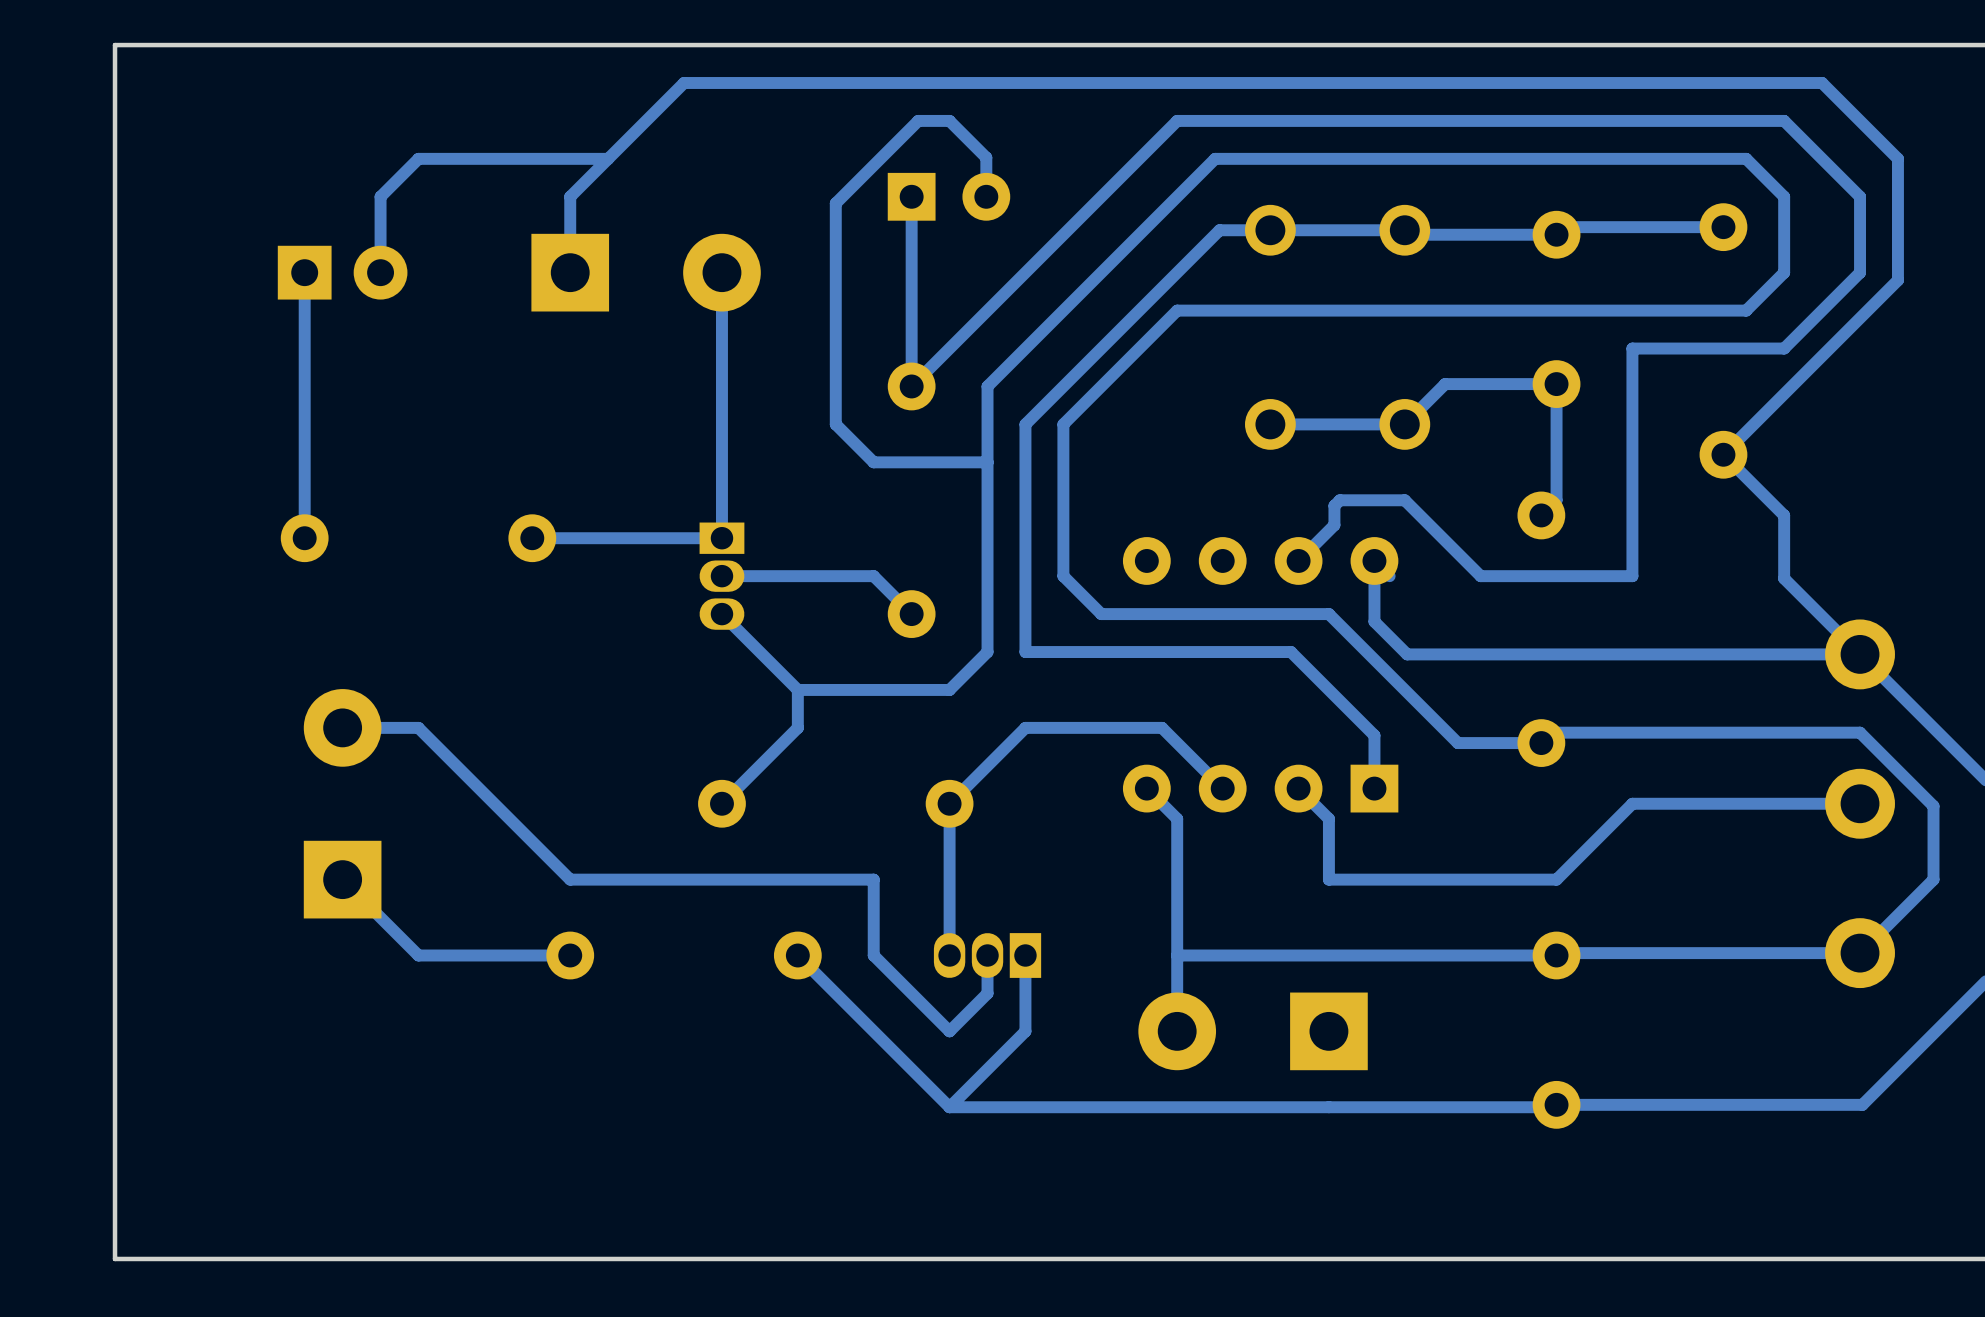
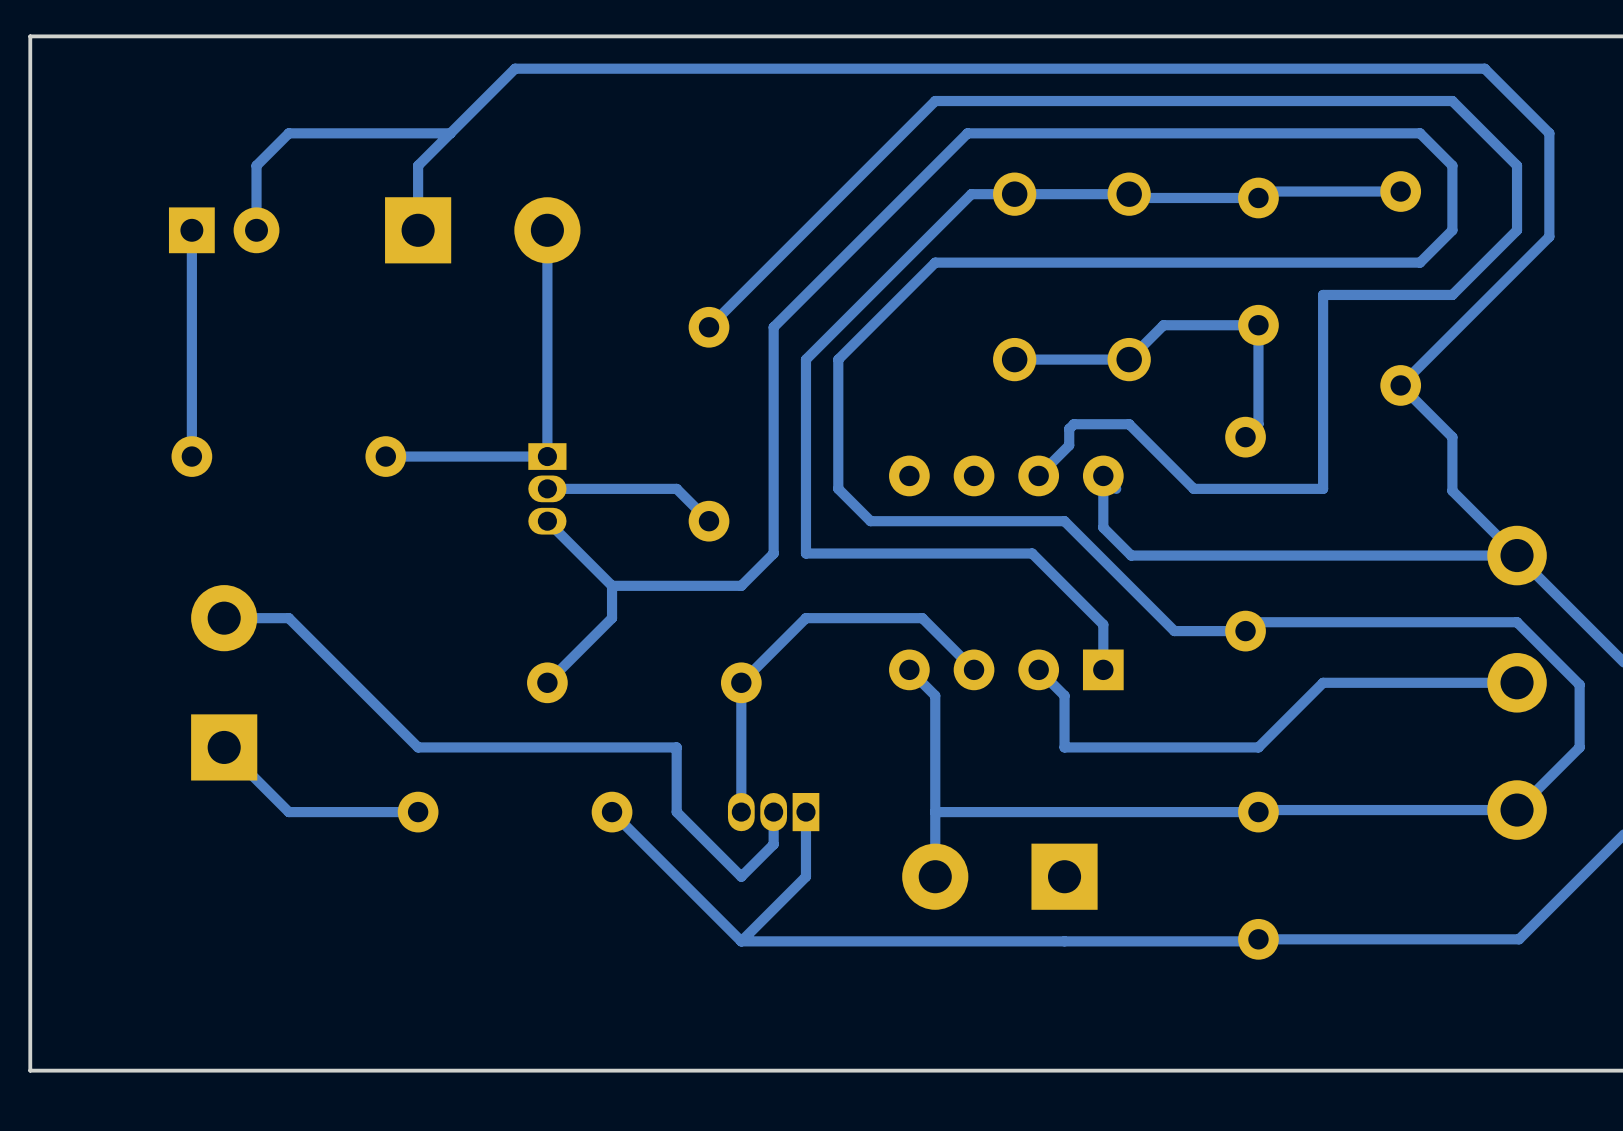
track: (911, 196) (911, 386) -> none
part: (948, 196) -> none
track: (986, 196) (986, 157) (949, 120) (918, 120) (835, 203) (835, 424) (873, 462) (987, 462) -> none

